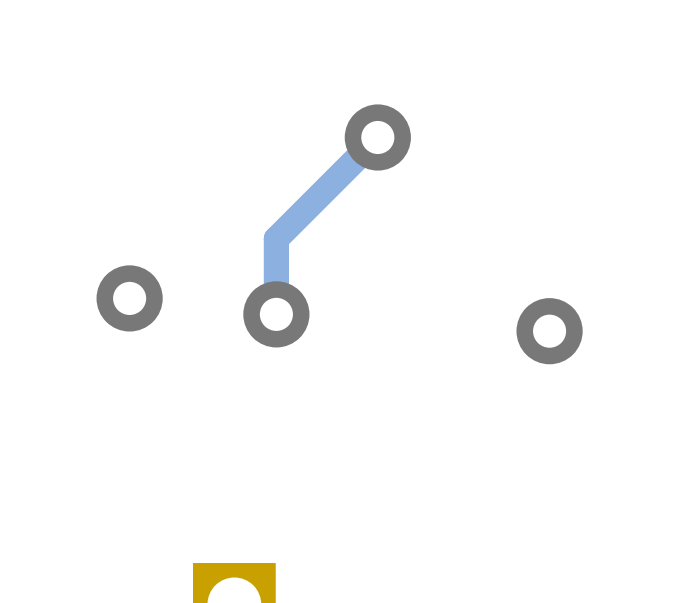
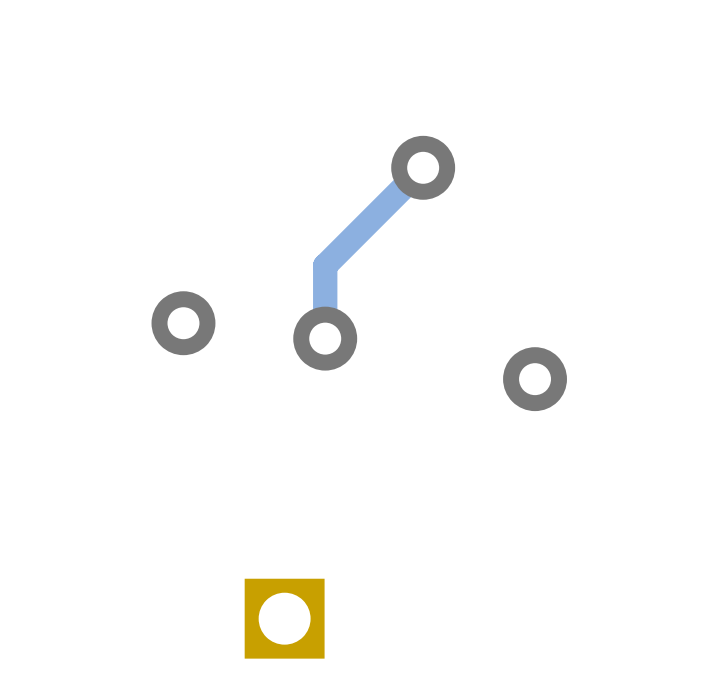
via position: (549, 331) -> (535, 379)

